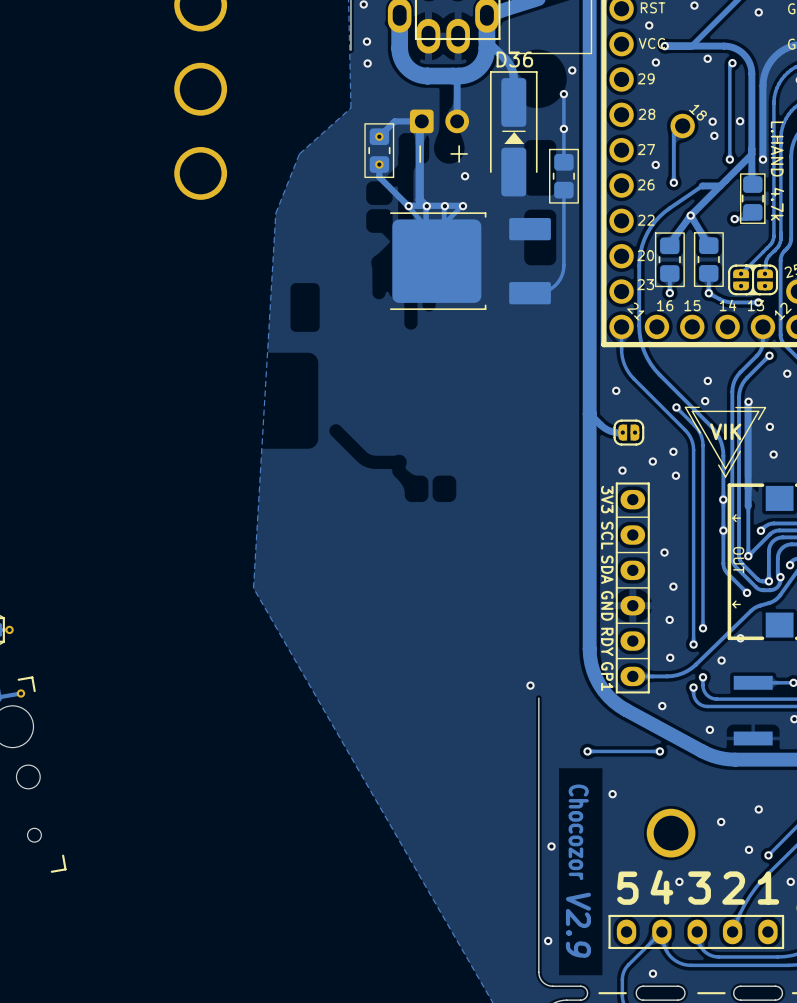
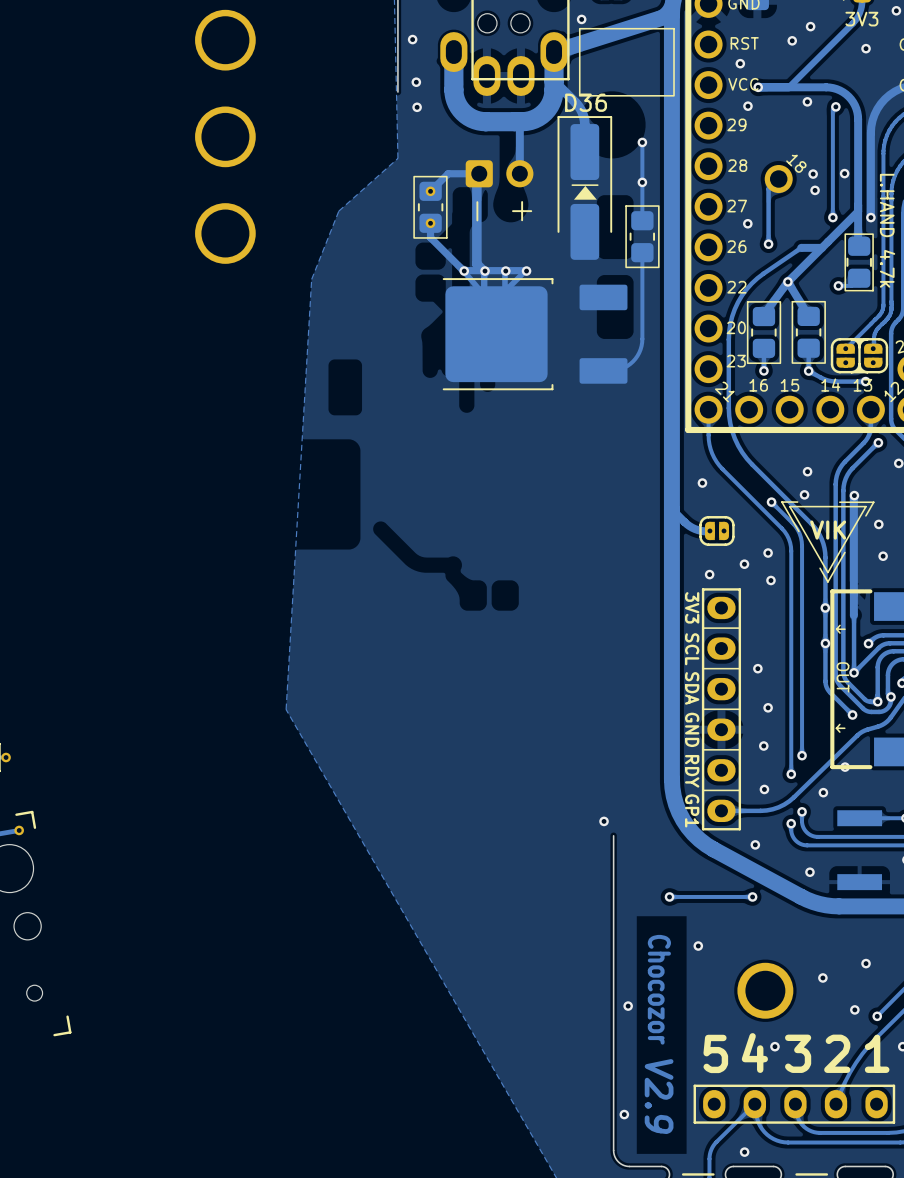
via: (572, 70) -> none
via: (465, 176) -> none

